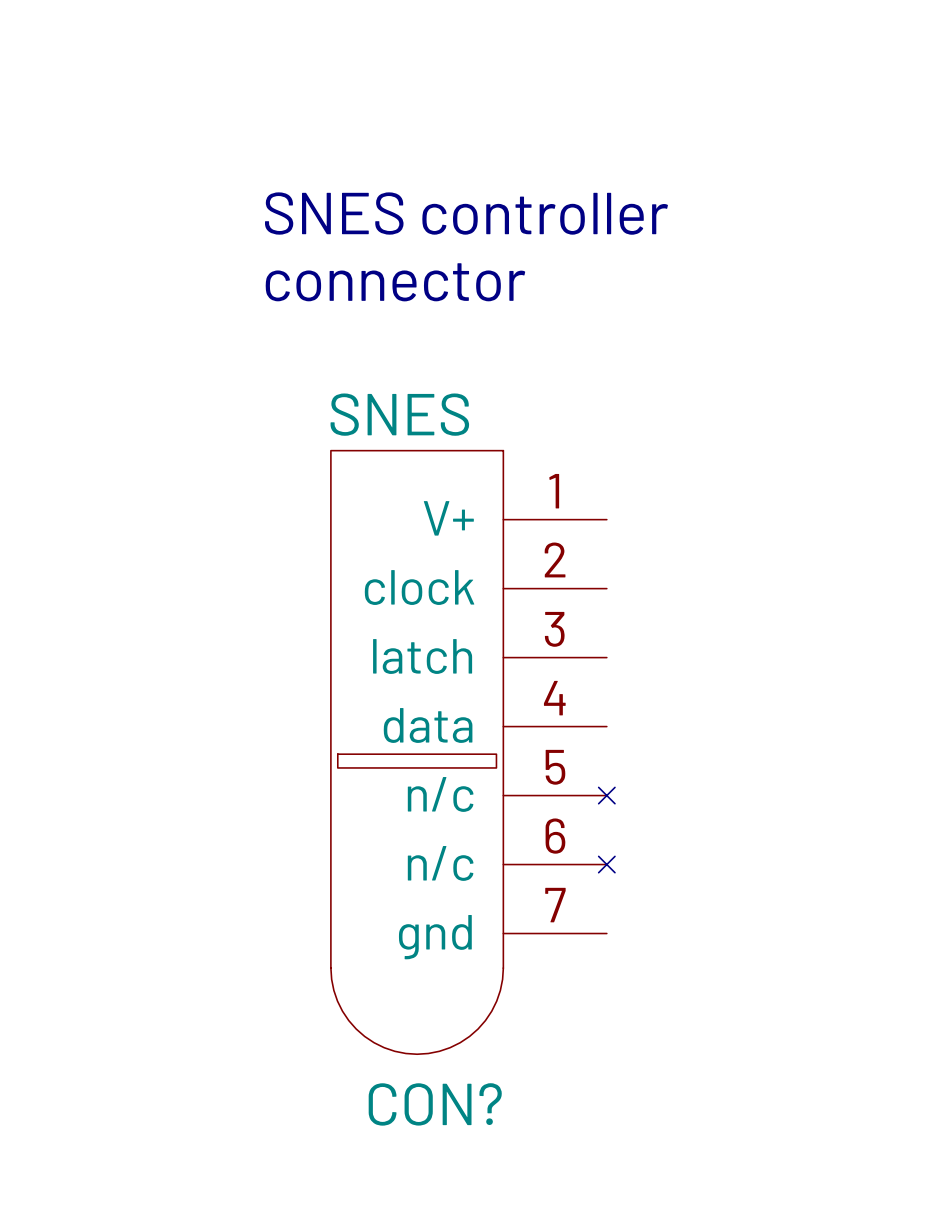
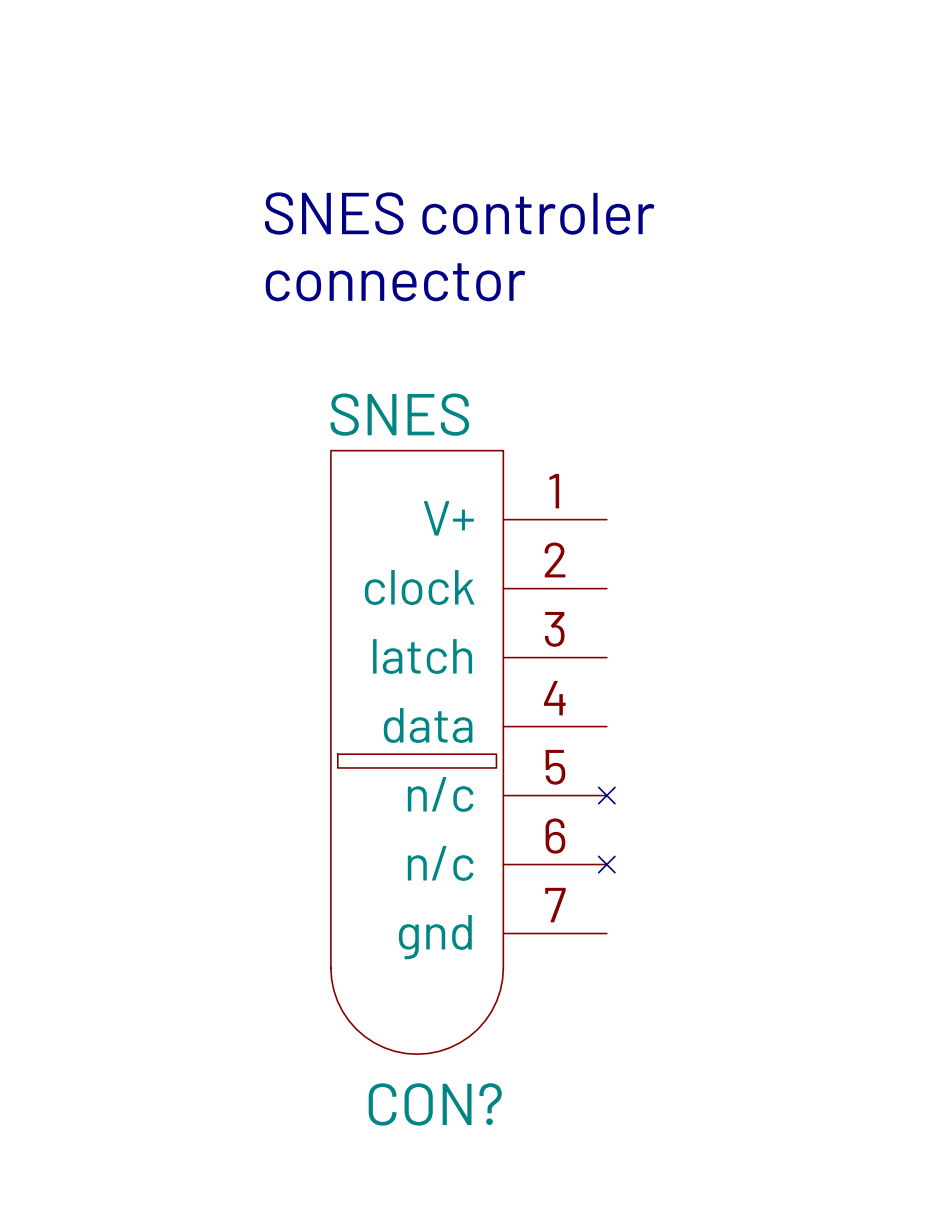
text: SNES controller (466, 213) -> SNES controler (459, 213)

